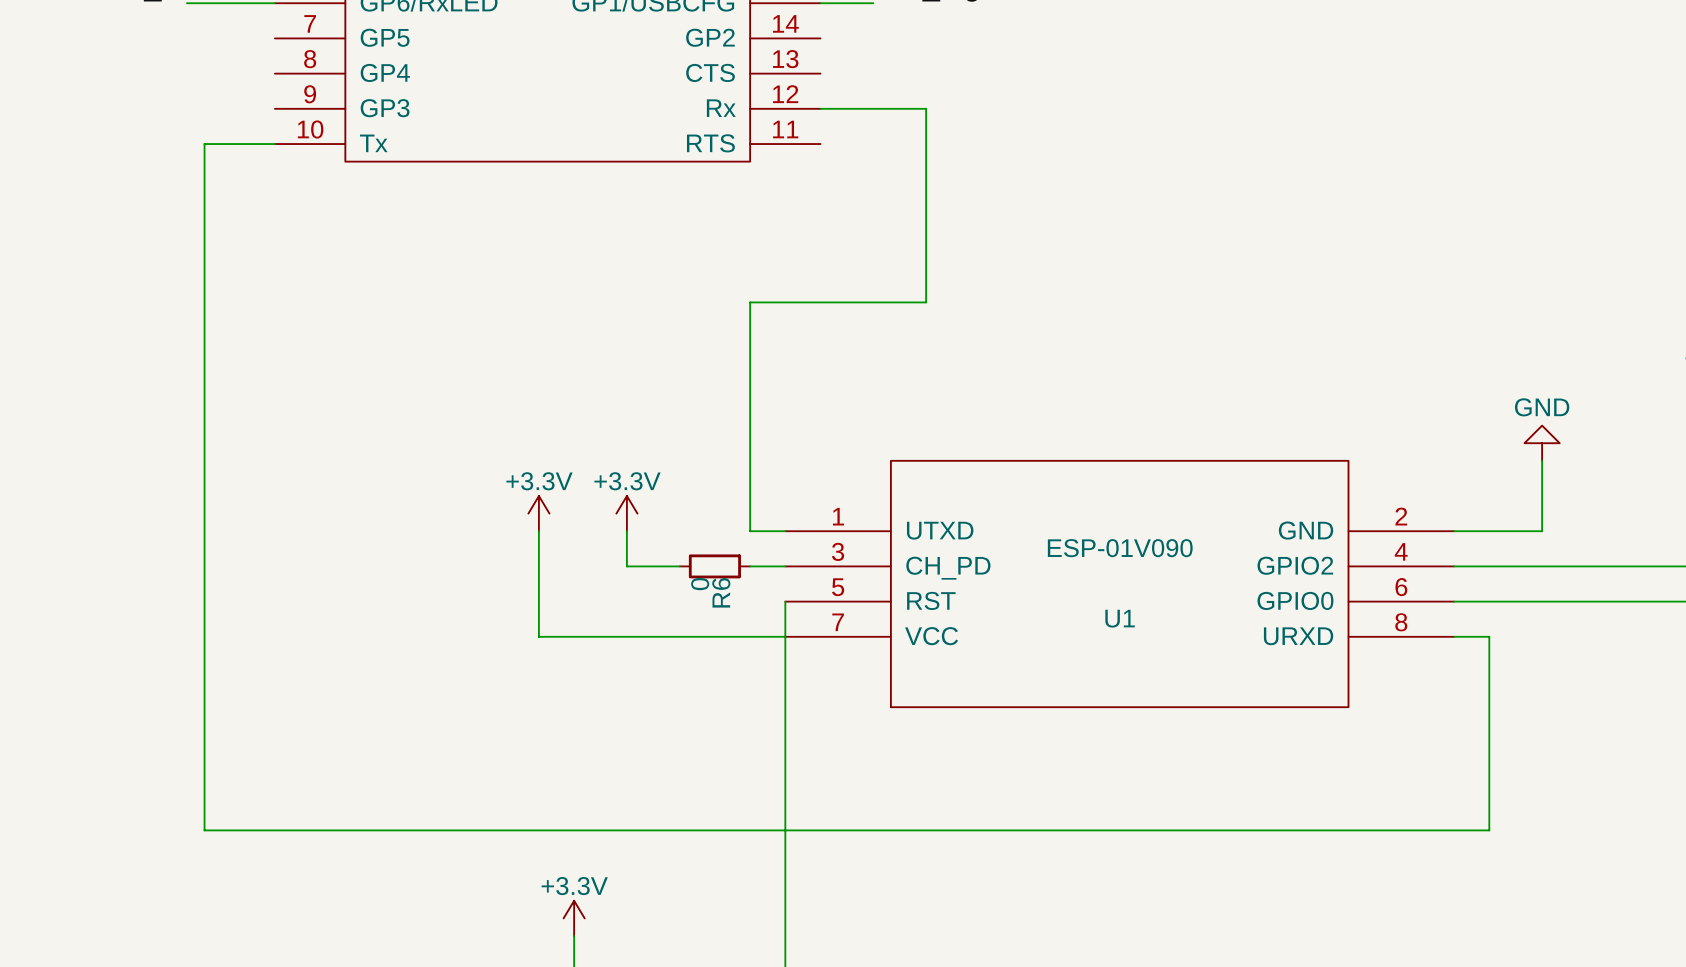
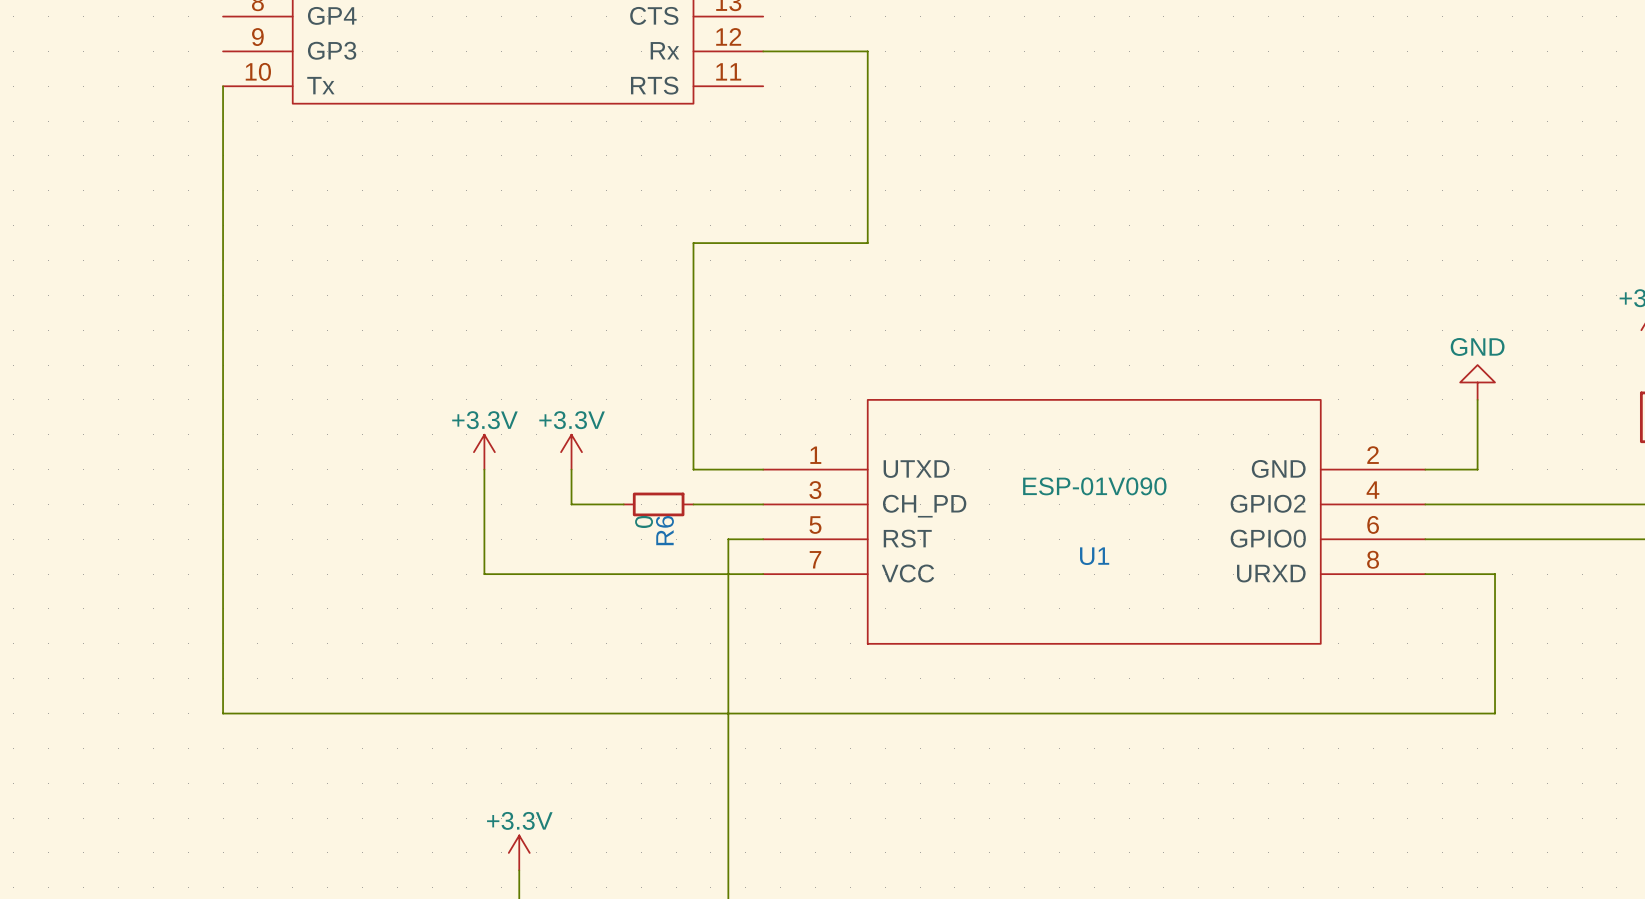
wire: (274, 144) (204, 144) (204, 830) (1489, 830) (1489, 636) (1454, 636) -> (223, 86) (223, 713) (1495, 713) (1495, 574) (1425, 574)
U1 position: (1119, 584) -> (1094, 521)

